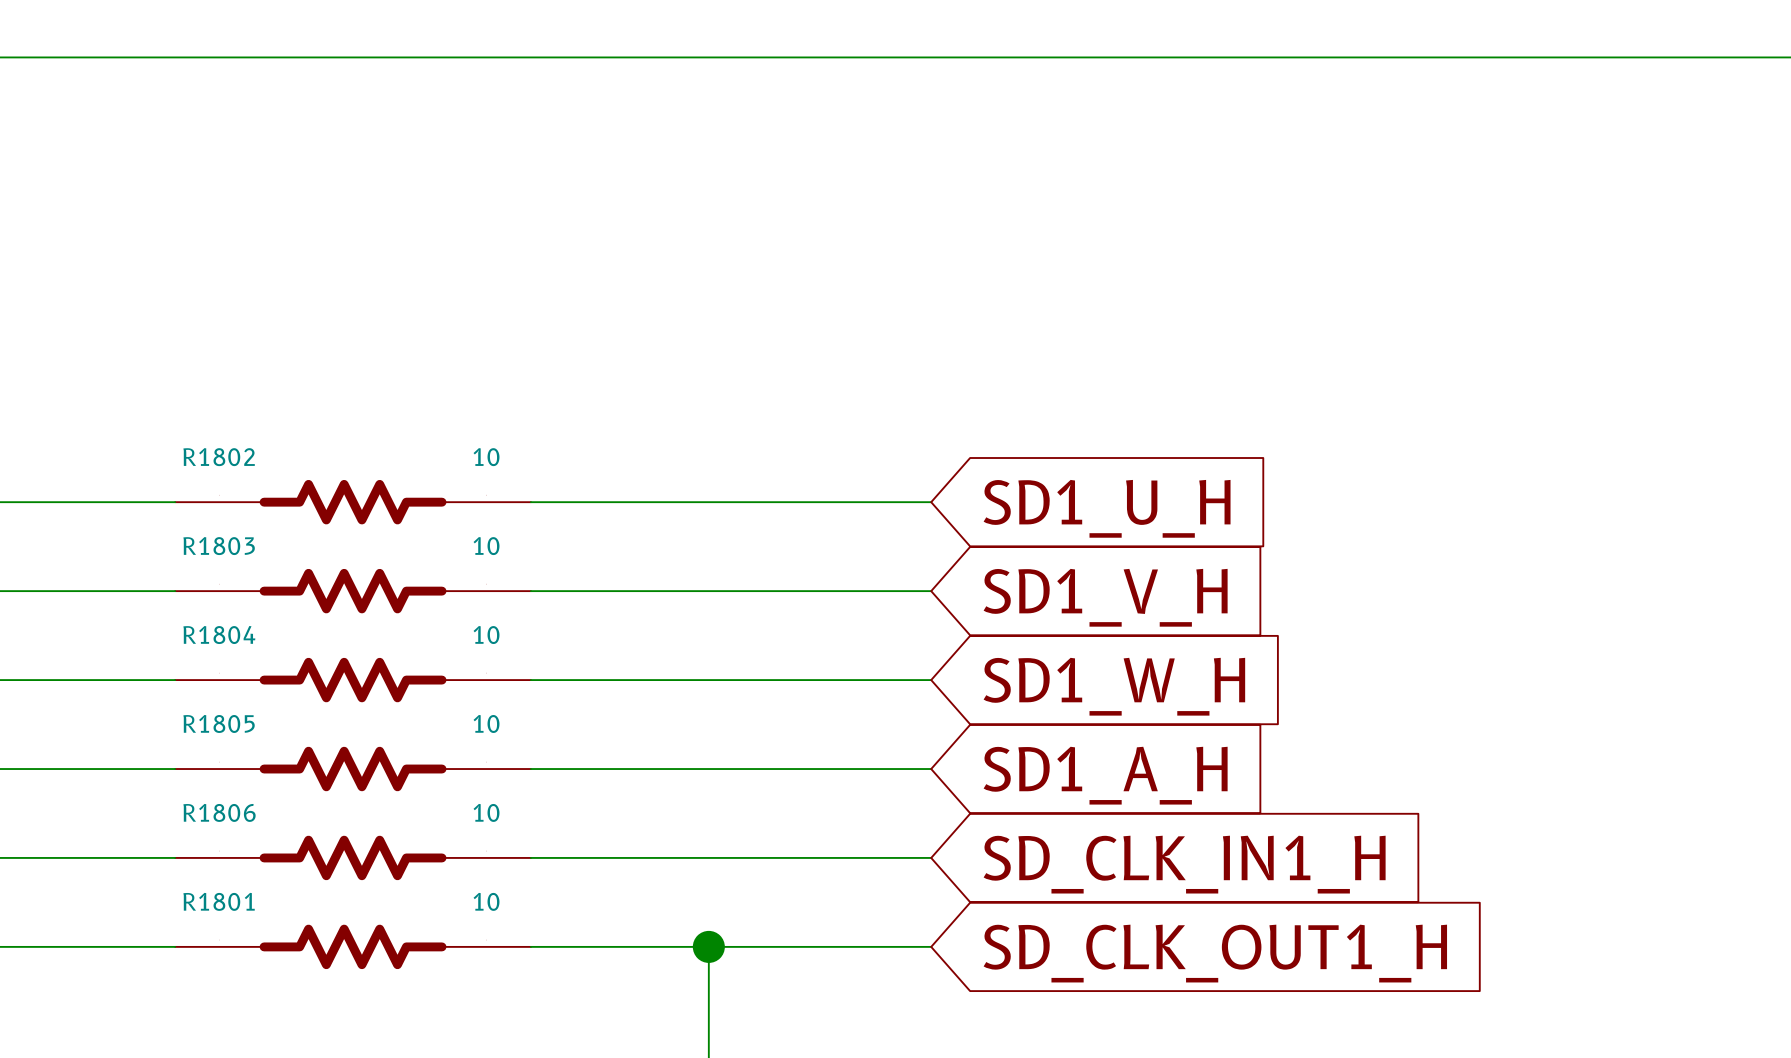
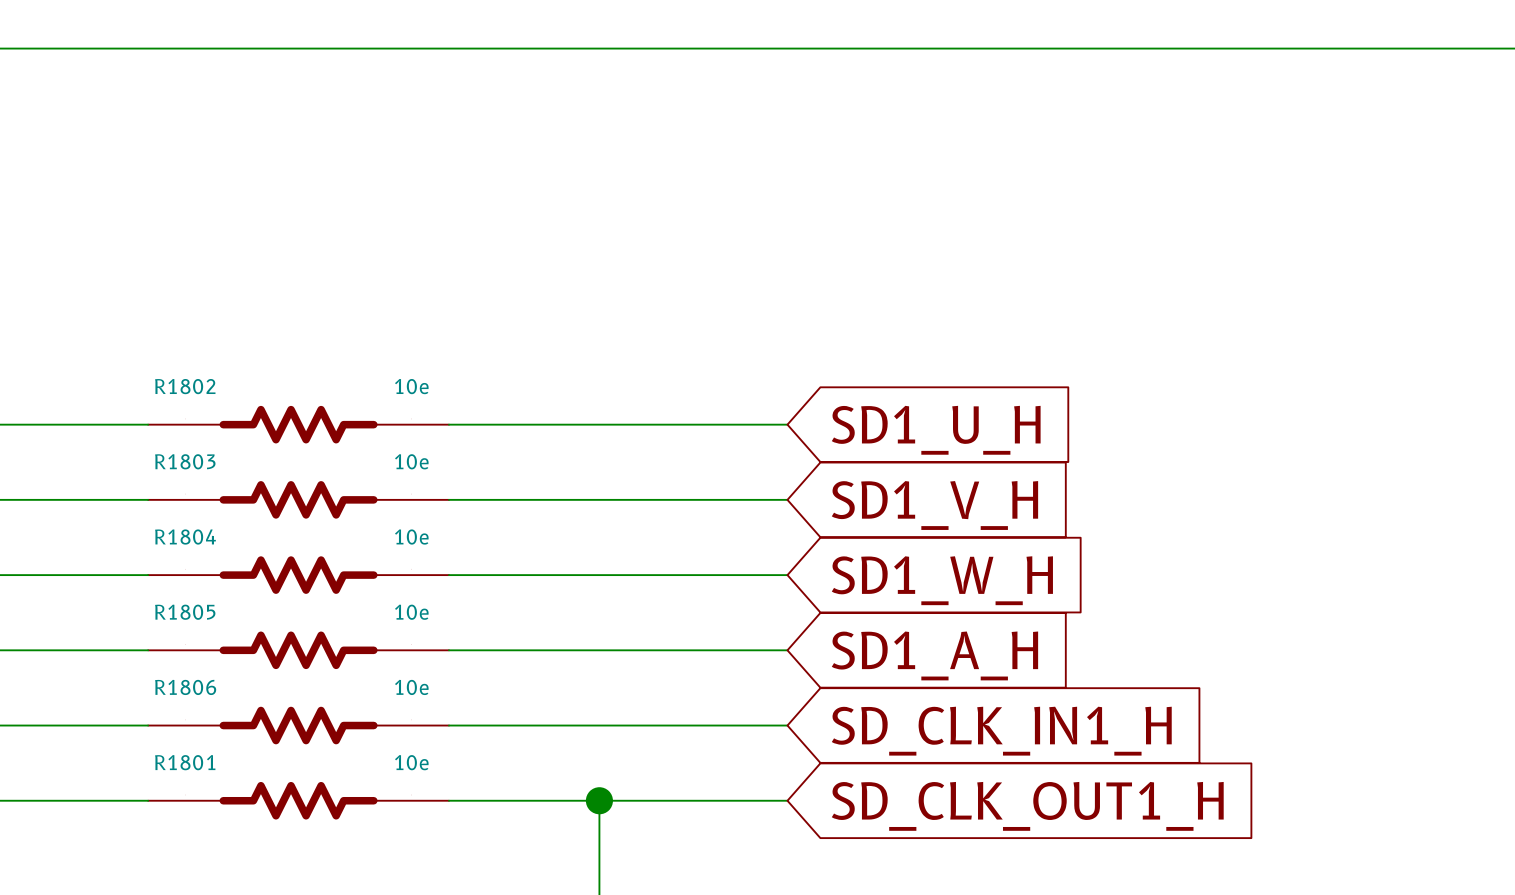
R1802 value: 10 (486, 457) -> 10e (411, 386)
R1803 value: 10 (486, 546) -> 10e (411, 461)
R1804 value: 10 (486, 635) -> 10e (411, 537)
R1805 value: 10 (486, 723) -> 10e (411, 612)
R1806 value: 10 (486, 812) -> 10e (411, 687)
R1801 value: 10 (486, 901) -> 10e (411, 762)

